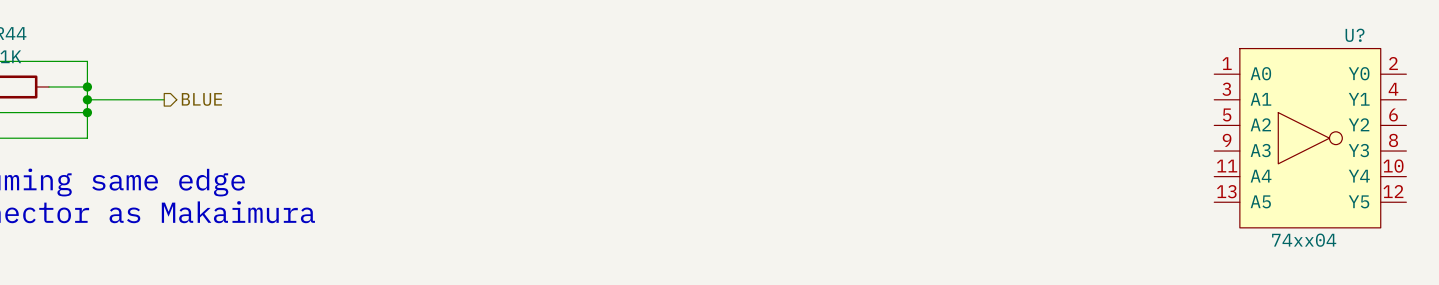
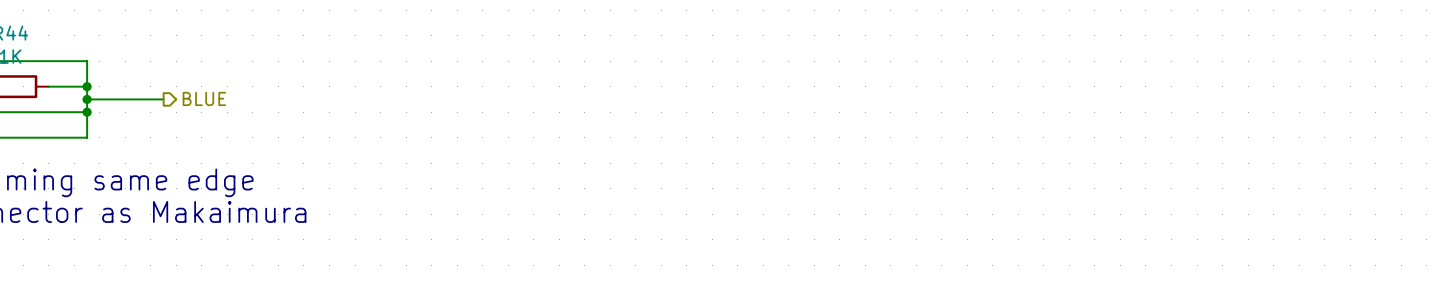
U?: 74xx04 (1310, 138) -> none

